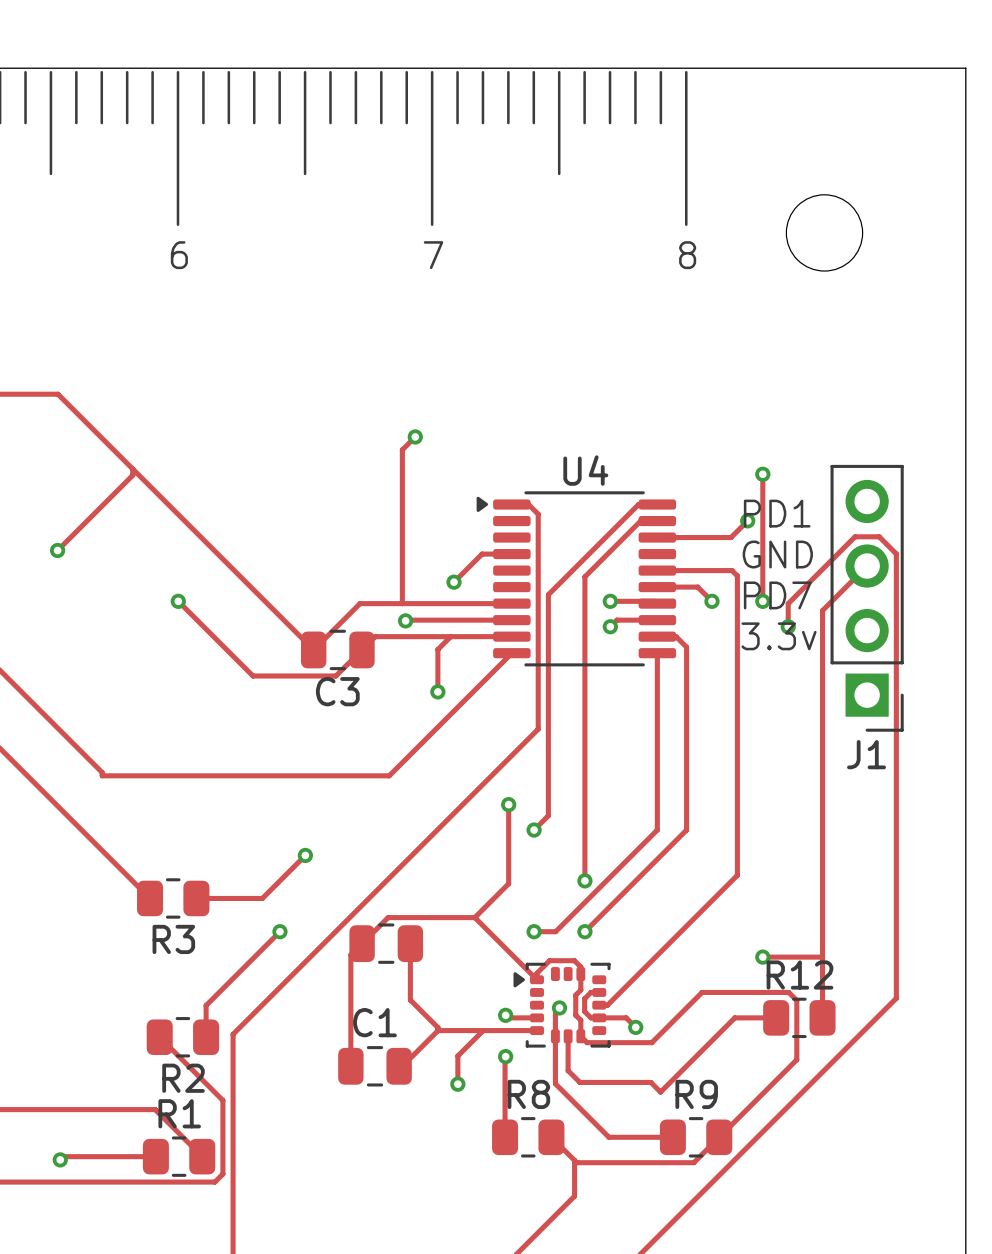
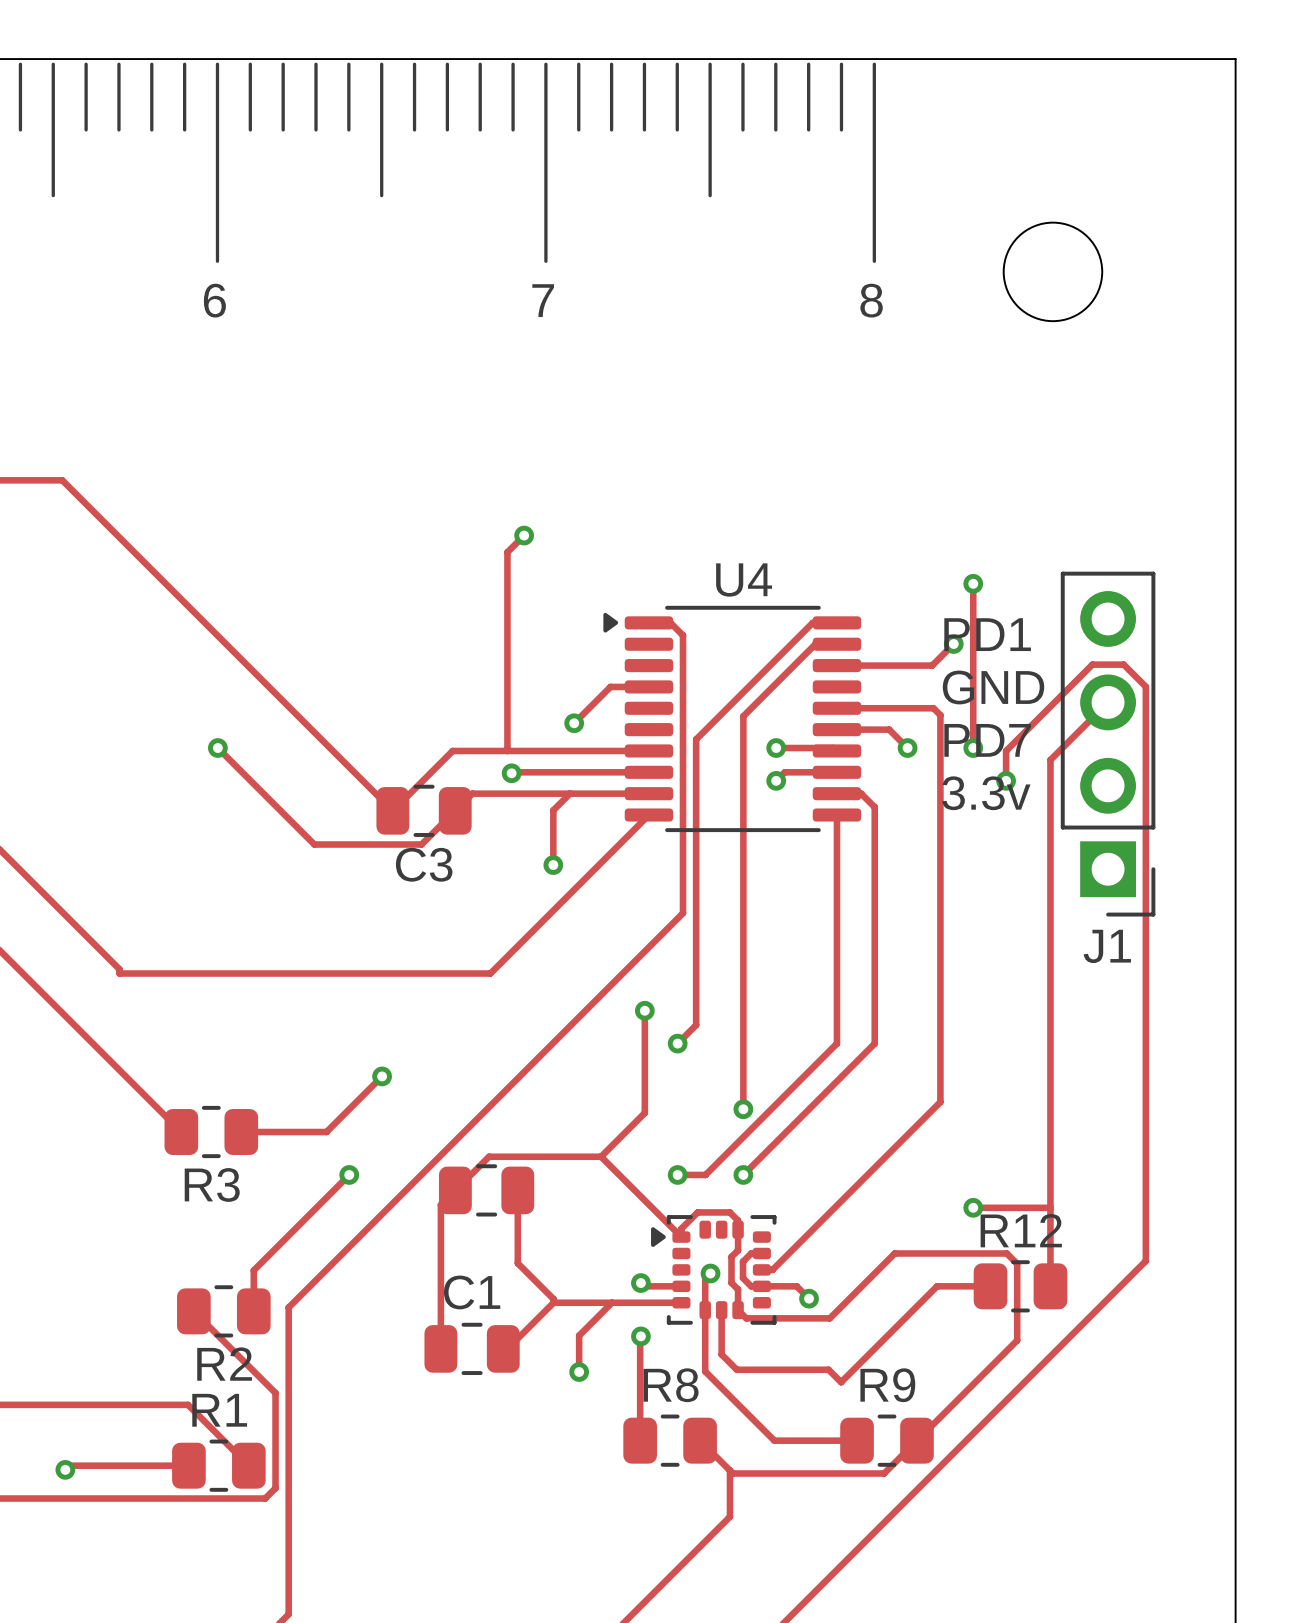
track: (132, 469) (132, 475) (57, 550) -> none
via: (57, 550) -> none

